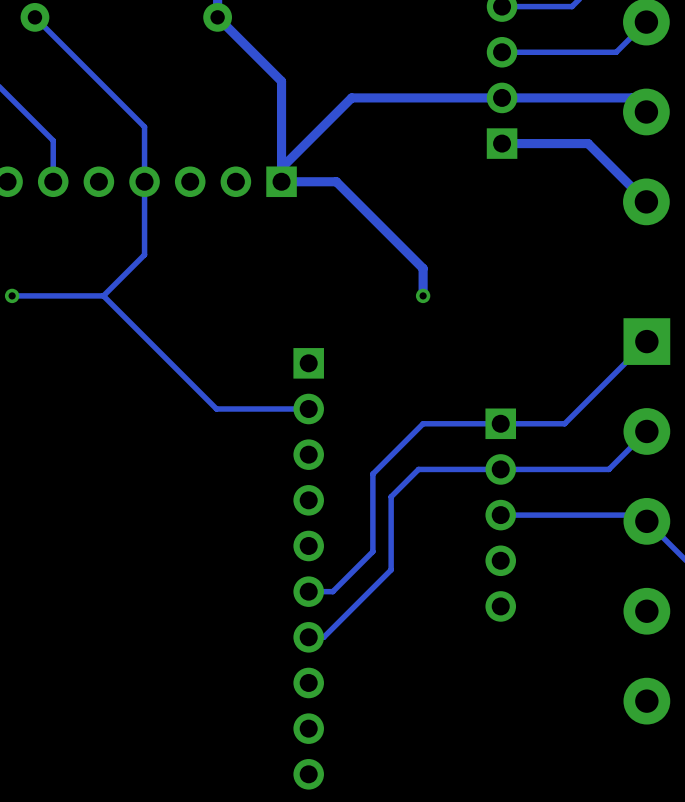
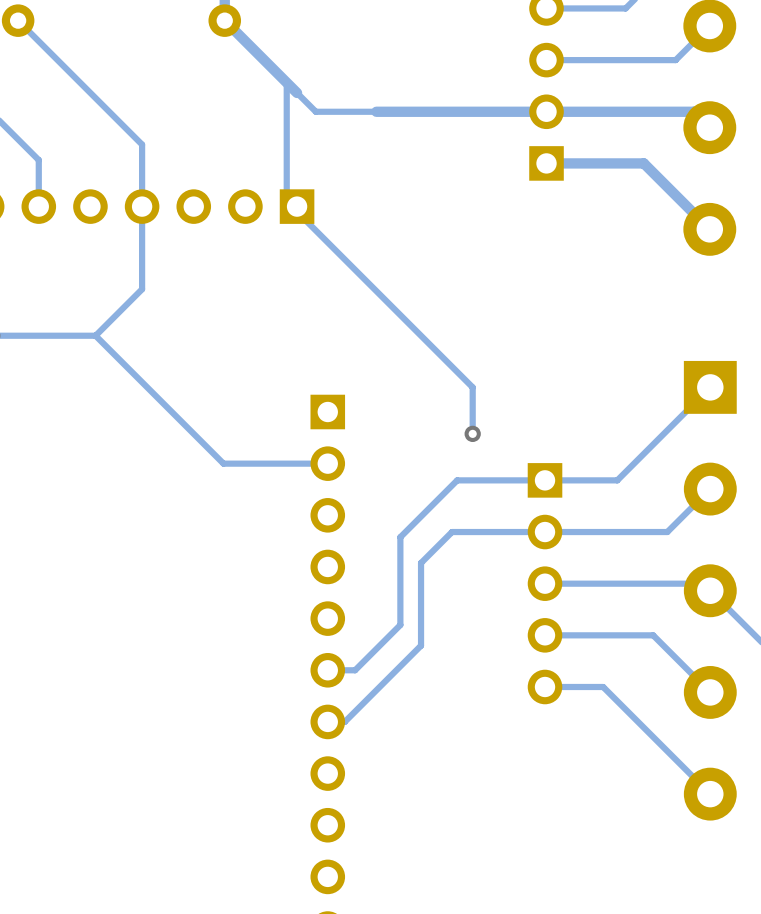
track: none -> (286, 82) (286, 196) (297, 206)
track: (281, 81) (281, 181) (336, 181) (423, 268) (423, 295) -> none
track: (351, 97) (281, 168) -> (376, 111) (315, 111) (297, 92)
track: none -> (297, 211) (472, 387) (472, 433)
via position: (423, 295) -> (472, 433)
track: none -> (545, 635) (653, 635) (710, 692)
track: none -> (545, 686) (603, 686) (710, 794)

